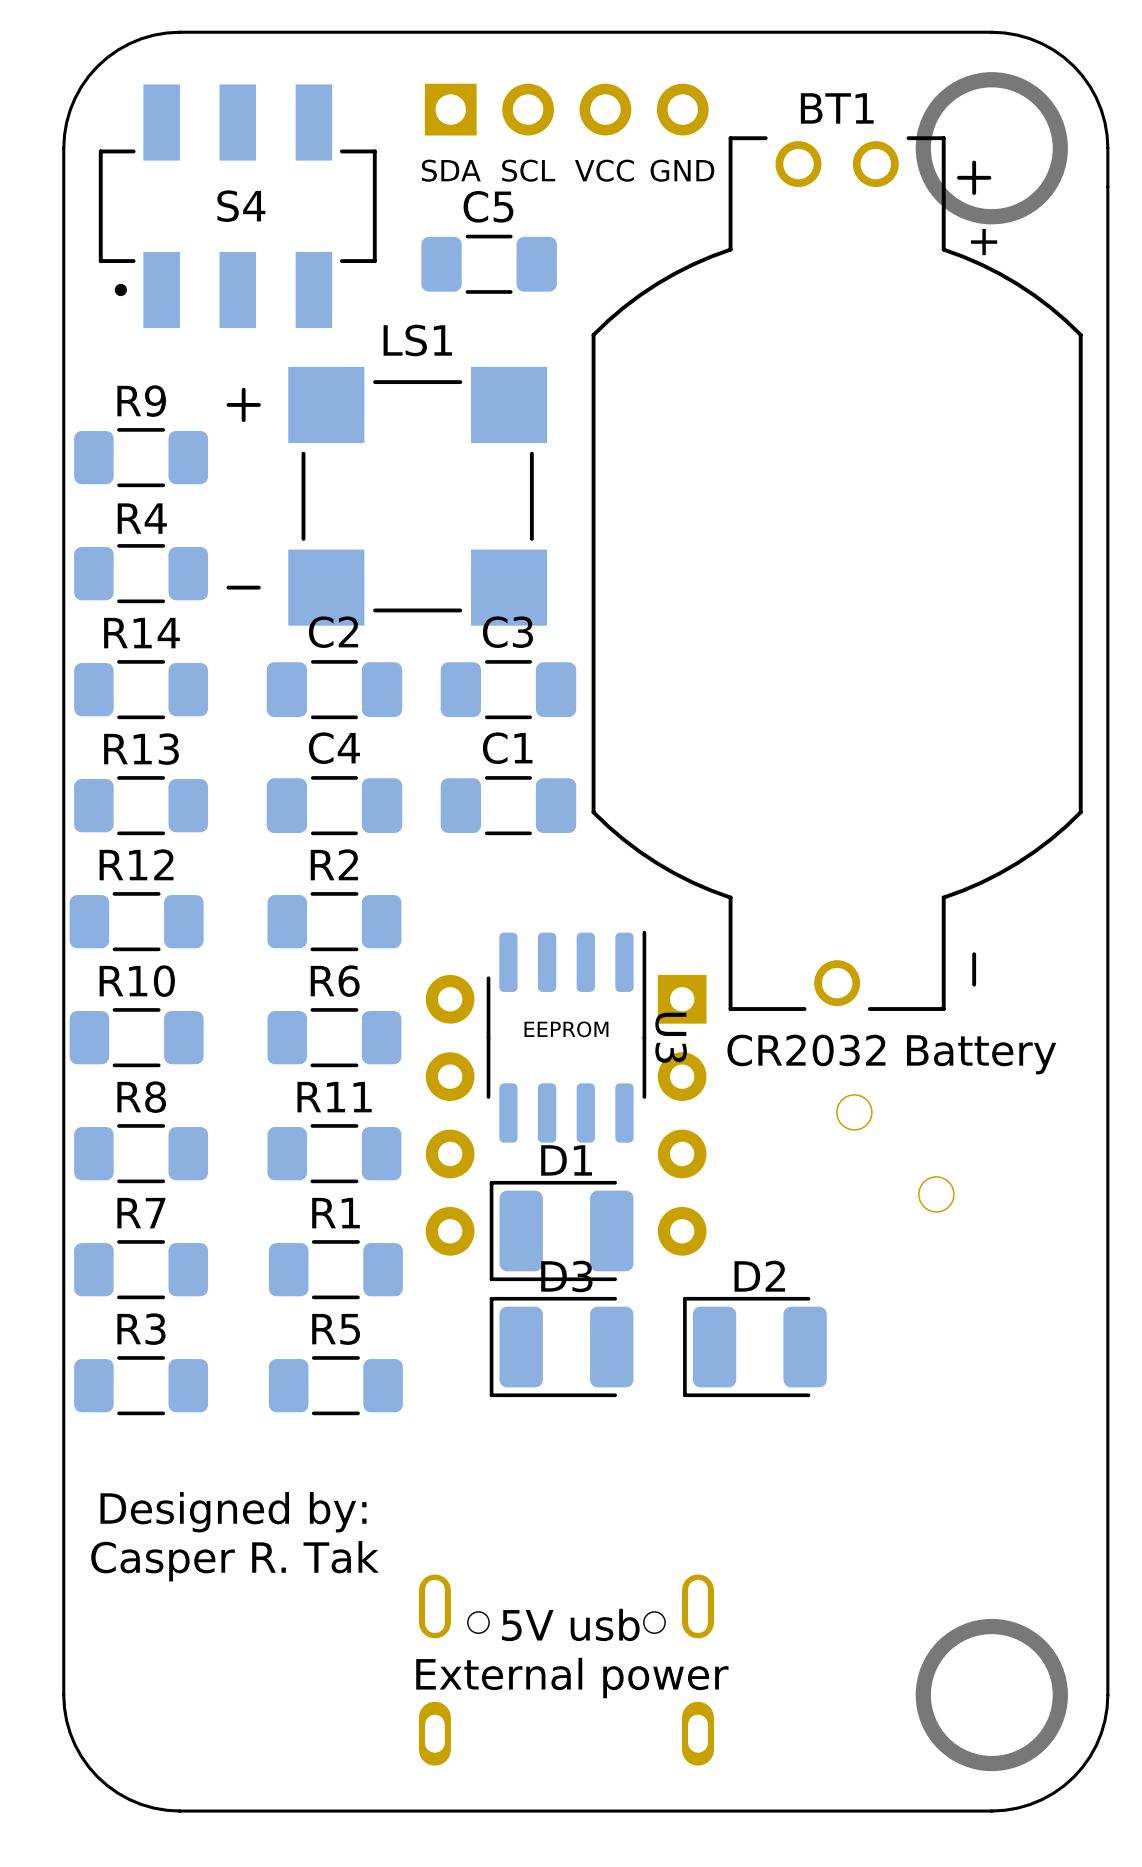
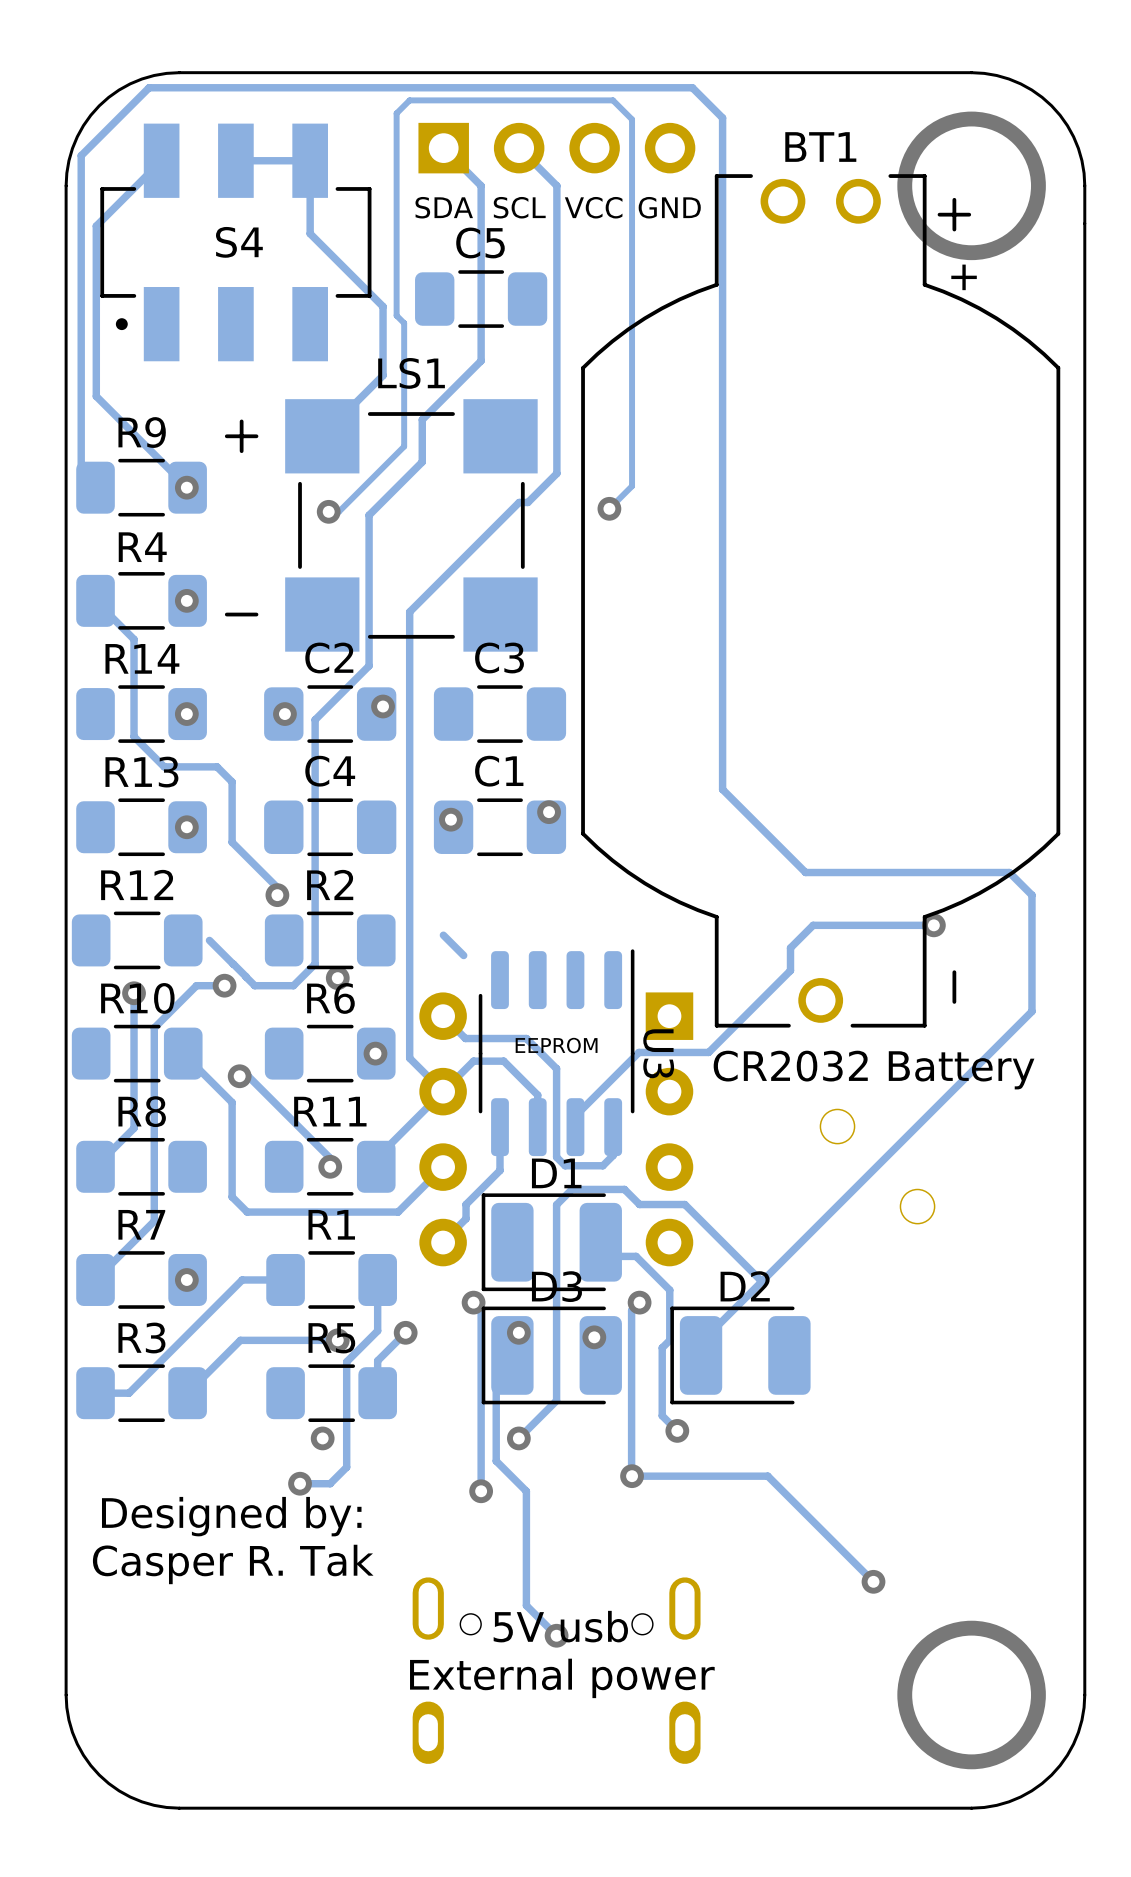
track: none -> (519, 148) (556, 185) (556, 473) (527, 502) (519, 502) (409, 611) (409, 1058) (443, 1091)
track: none -> (161, 160) (96, 226) (96, 396) (187, 487)
track: none -> (235, 160) (310, 160) (310, 233) (383, 306) (383, 375) (322, 436)
track: none -> (464, 168) (481, 185) (481, 360) (422, 419) (422, 462) (369, 515) (369, 665) (315, 719) (315, 964) (293, 985) (254, 985) (209, 940)
track: none -> (95, 487) (81, 473) (81, 155) (149, 87) (692, 87) (722, 117) (722, 789) (805, 872) (1009, 872) (1031, 895) (1031, 1011) (701, 1342) (701, 1355)
via: none -> (186, 487)
track: none -> (609, 508) (632, 486) (632, 119) (612, 100) (409, 100) (396, 113) (396, 315) (404, 323) (404, 446) (338, 511) (328, 511)
via: none -> (609, 508)
via: none -> (328, 511)
track: none -> (95, 600) (134, 639) (134, 736) (164, 766) (217, 766) (232, 781) (232, 842) (277, 887) (277, 895)
via: none -> (186, 600)
via: none -> (383, 706)
via: none -> (186, 714)
via: none -> (284, 714)
via: none -> (549, 812)
via: none -> (450, 819)
via: none -> (186, 827)
via: none -> (277, 895)
track: none -> (933, 925) (813, 925) (790, 947) (790, 970) (708, 1052) (638, 1052) (575, 1115) (575, 1127)
via: none -> (933, 925)
track: none -> (443, 935) (463, 955)
via: none -> (337, 978)
track: none -> (224, 985) (196, 985) (154, 1027) (154, 1221) (95, 1279)
via: none -> (224, 985)
track: none -> (134, 993) (134, 1128) (95, 1166)
via: none -> (134, 993)
track: none -> (443, 1016) (465, 1038) (526, 1038) (556, 1068) (556, 1157) (565, 1165) (602, 1165) (613, 1155) (613, 1127)
track: none -> (183, 1053) (232, 1102) (232, 1196) (247, 1212) (398, 1212) (443, 1167)
via: none -> (375, 1053)
track: none -> (239, 1076) (248, 1076) (330, 1158) (330, 1166)
via: none -> (239, 1076)
track: none -> (499, 1127) (499, 1170) (466, 1204) (466, 1218) (443, 1242)
track: none -> (537, 1127) (537, 1095) (503, 1061) (473, 1061) (376, 1158) (376, 1166)
via: none -> (330, 1166)
track: none -> (600, 1242) (614, 1256) (636, 1256) (669, 1290) (669, 1340) (662, 1347) (662, 1415) (677, 1430)
via: none -> (186, 1279)
track: none -> (285, 1279) (242, 1279) (129, 1393) (95, 1393)
track: none -> (377, 1279) (377, 1330) (346, 1361) (346, 1467) (330, 1483) (300, 1483)
track: none -> (761, 1281) (684, 1204) (639, 1204) (624, 1189) (571, 1189) (556, 1204) (556, 1400) (518, 1438)
track: none -> (473, 1302) (481, 1310) (481, 1491)
via: none -> (473, 1302)
track: none -> (639, 1302) (631, 1310) (631, 1475) (767, 1476) (873, 1581)
via: none -> (639, 1302)
track: none -> (405, 1332) (377, 1360) (377, 1393)
via: none -> (405, 1332)
via: none -> (518, 1332)
via: none -> (594, 1337)
track: none -> (337, 1340) (240, 1340) (187, 1393)
via: none -> (337, 1340)
track: none -> (512, 1355) (496, 1370) (496, 1461) (526, 1491) (526, 1605) (556, 1635)
via: none -> (677, 1430)
via: none -> (322, 1438)
via: none -> (518, 1438)
via: none -> (632, 1476)
via: none -> (300, 1483)
via: none -> (481, 1491)
via: none -> (873, 1581)
via: none -> (556, 1635)

